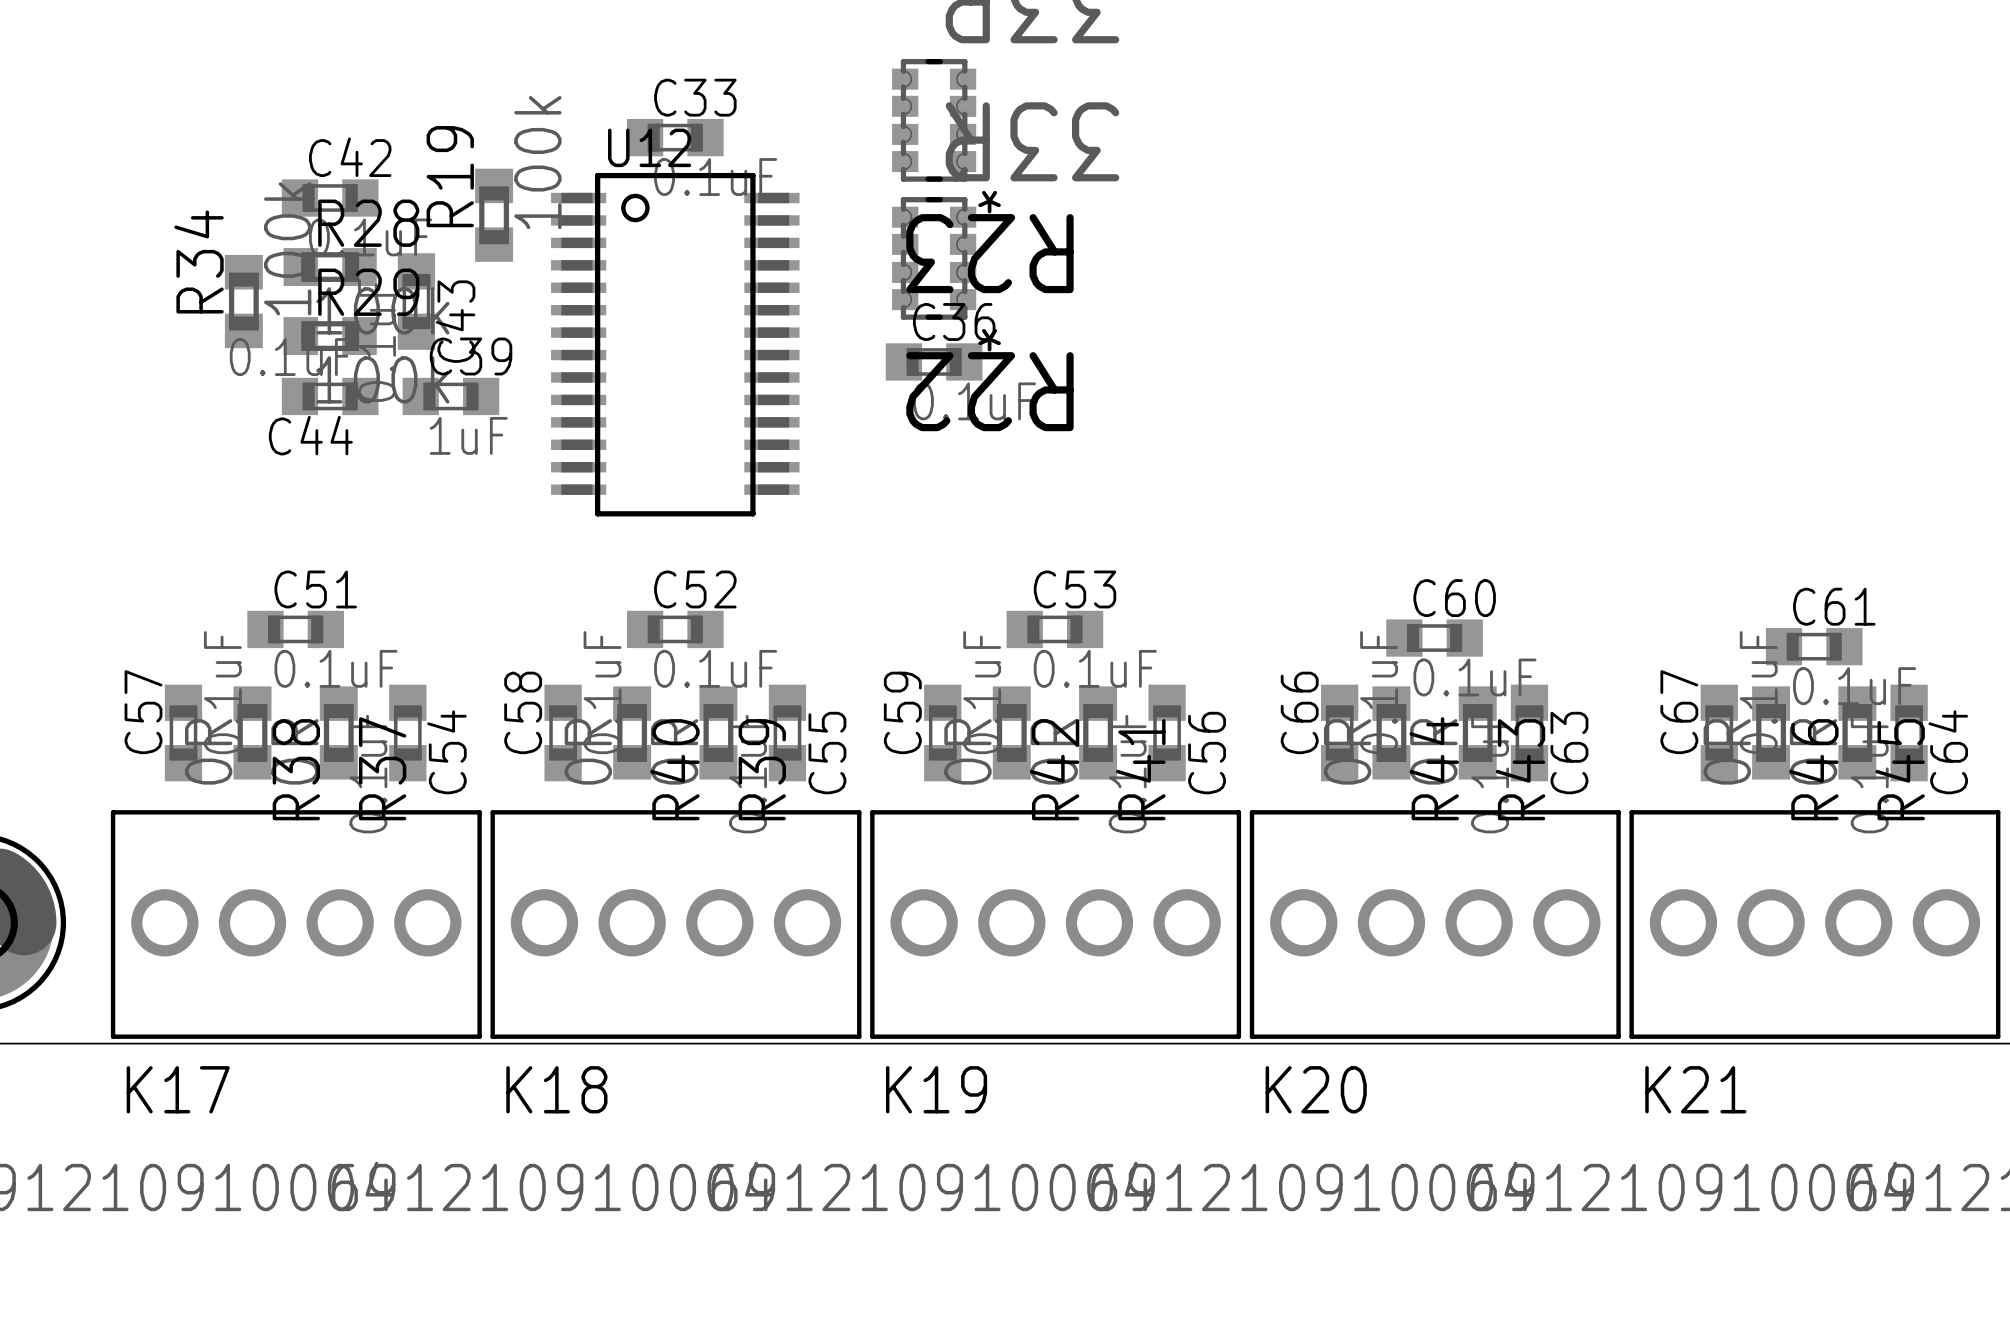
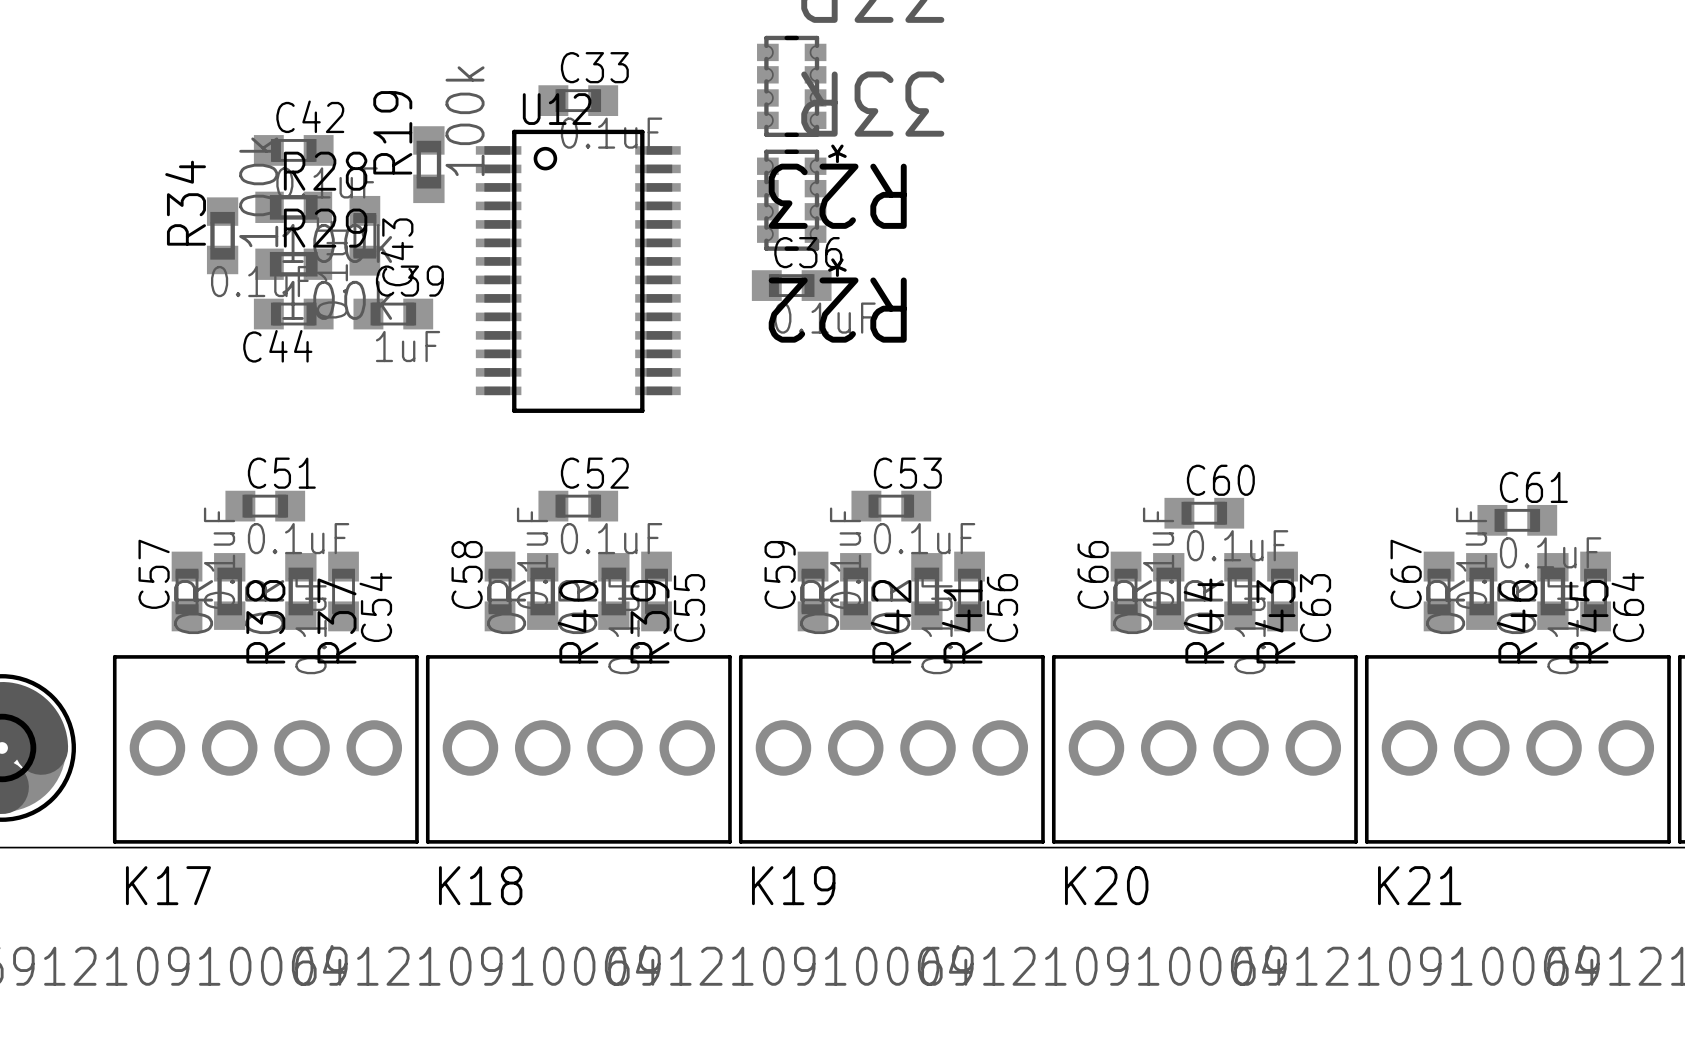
C57 position: (183, 732) -> (187, 591)
C54 position: (407, 732) -> (343, 591)
C58 position: (563, 732) -> (500, 591)
C55 position: (787, 732) -> (656, 591)
C59 position: (942, 732) -> (813, 591)
C56 position: (1167, 732) -> (969, 591)

